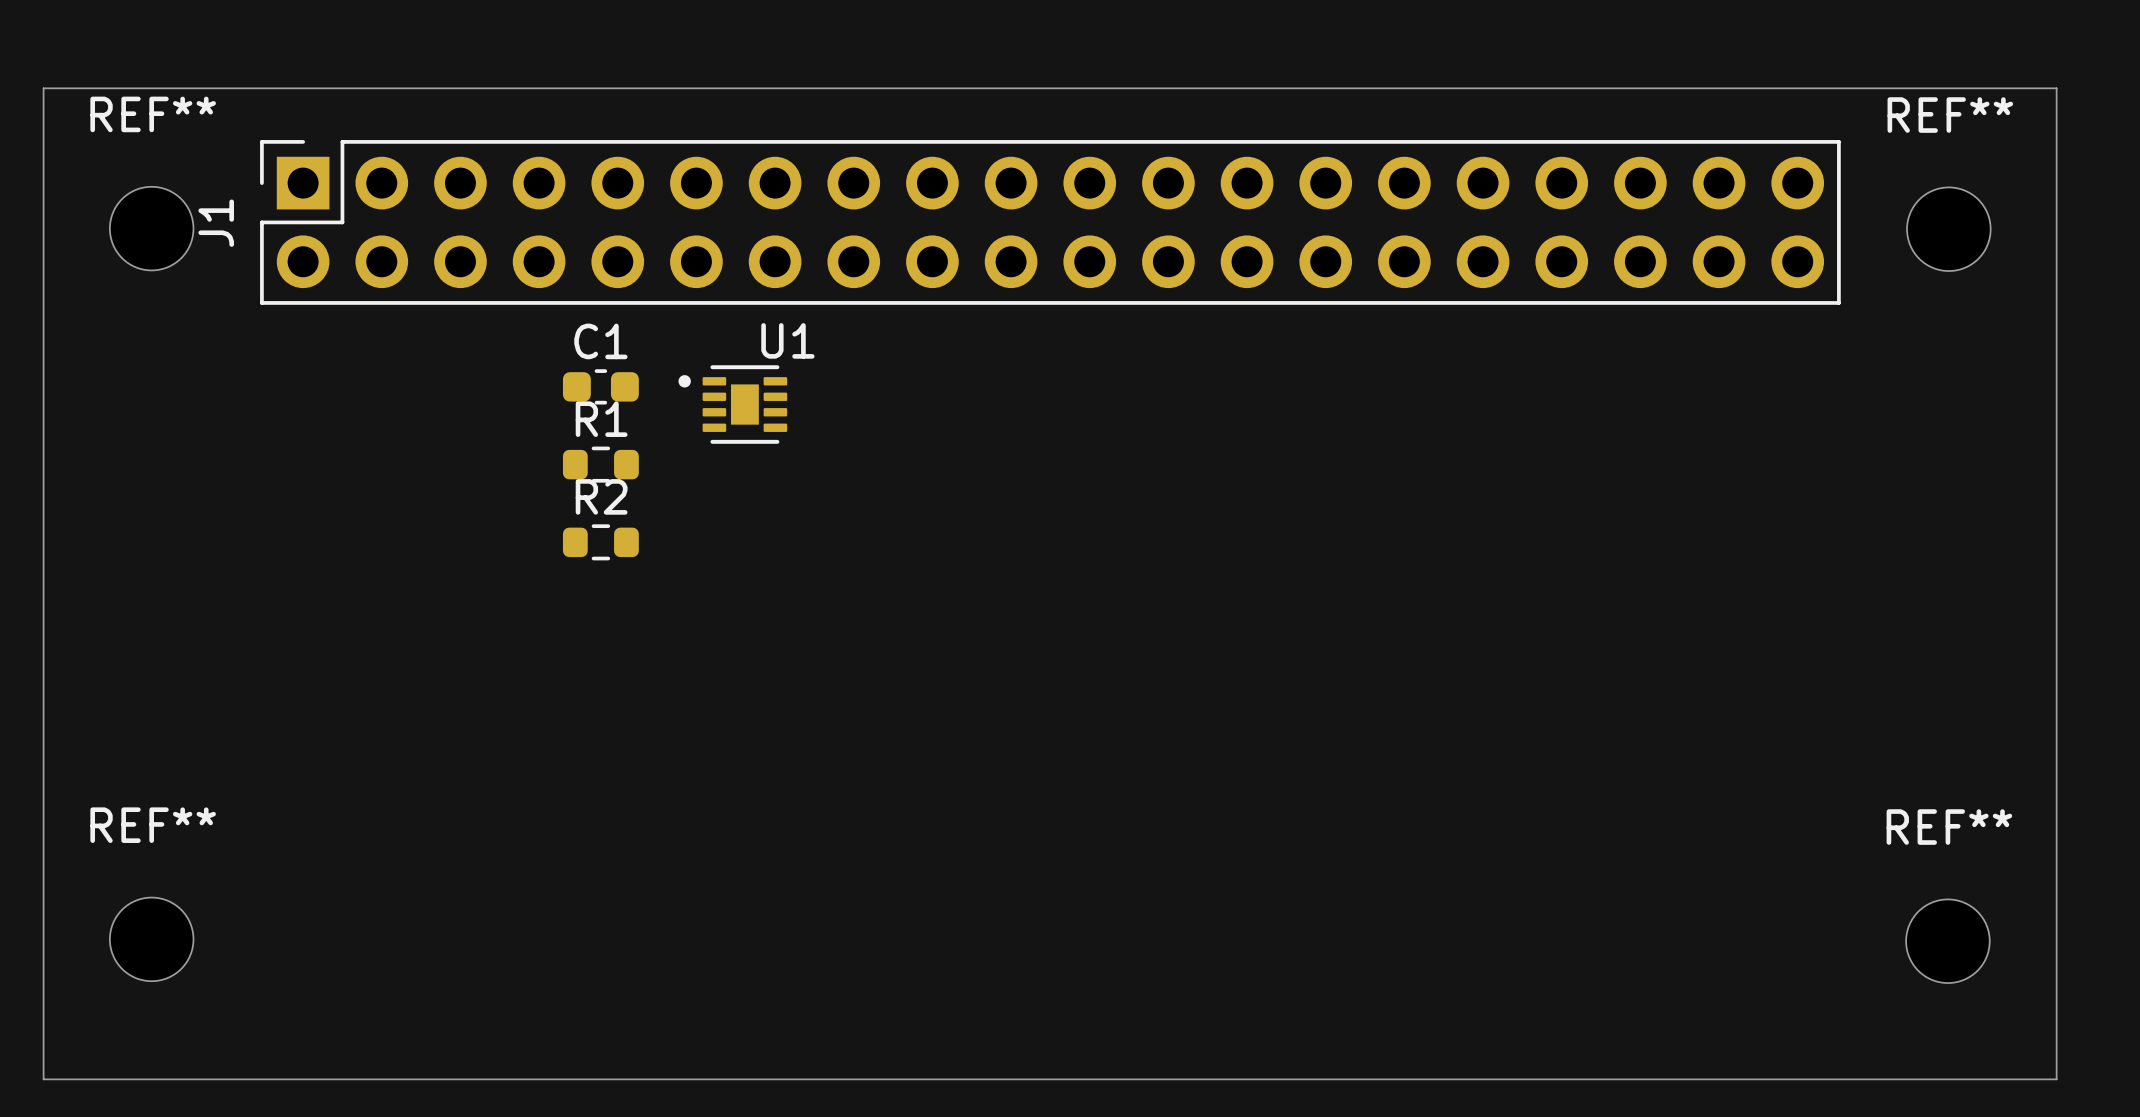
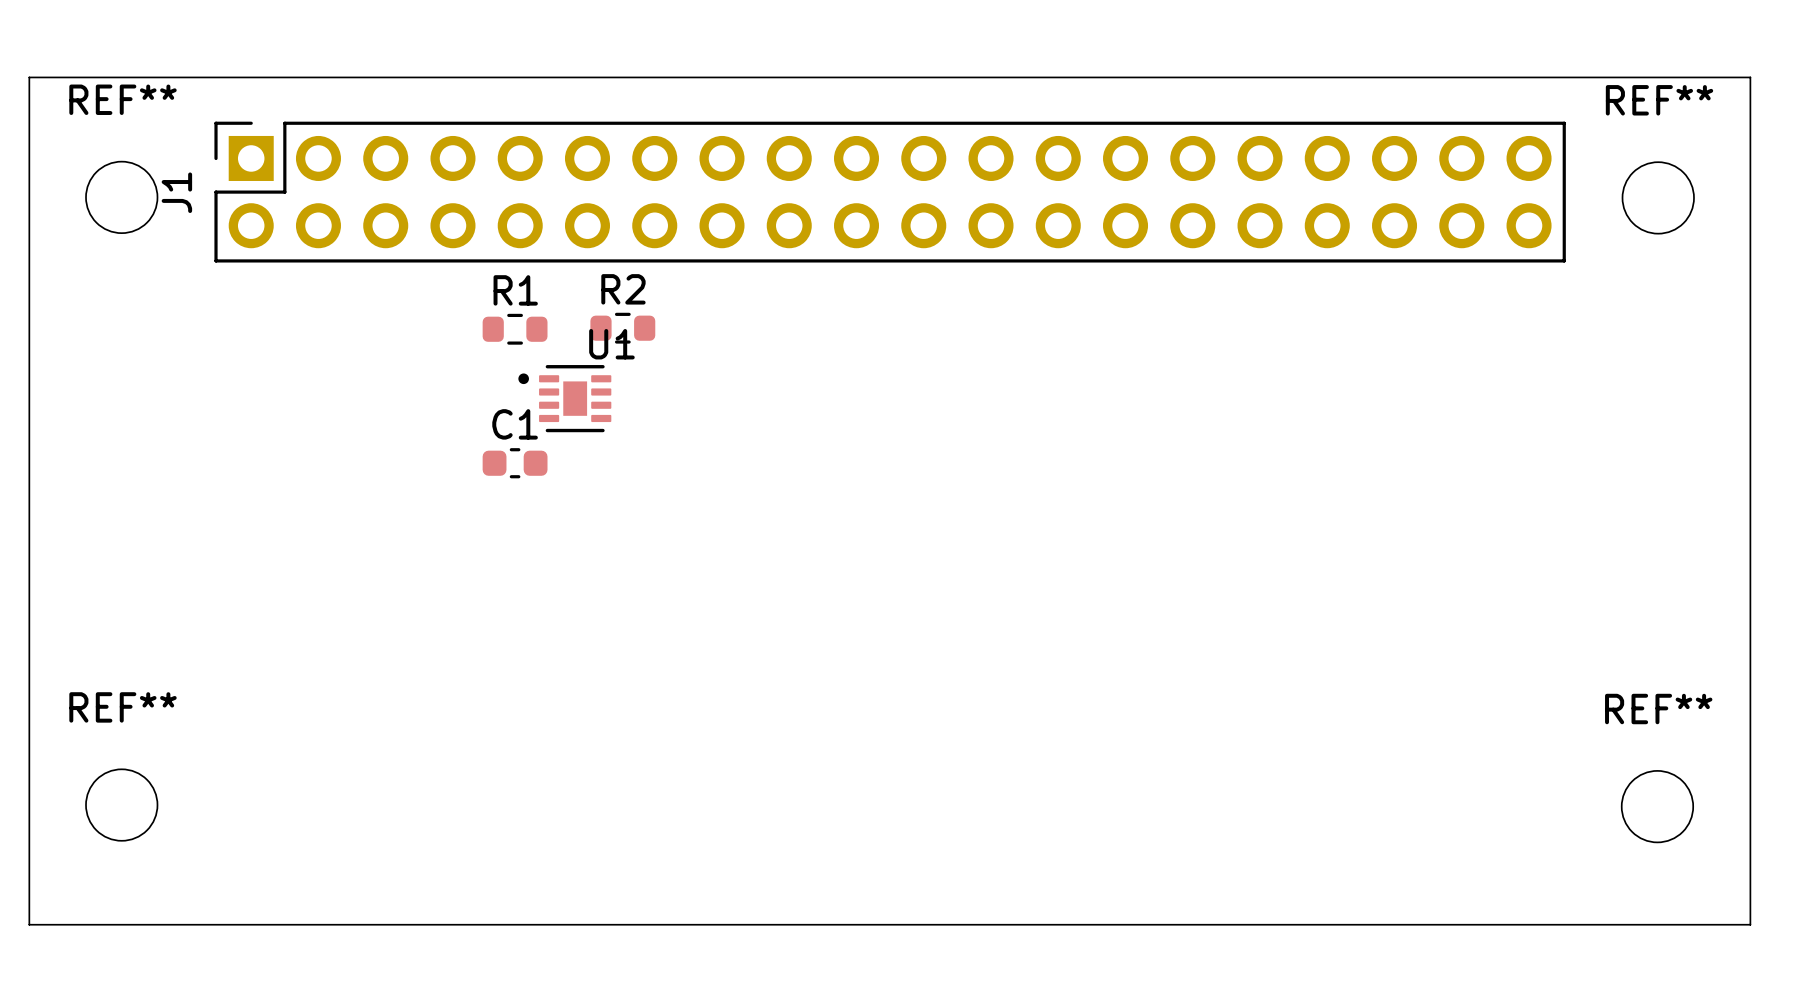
C1 position: (600, 386) -> (515, 463)
U1 position: (732, 404) -> (564, 398)
R1 position: (600, 464) -> (515, 329)
R2 position: (600, 542) -> (622, 328)

